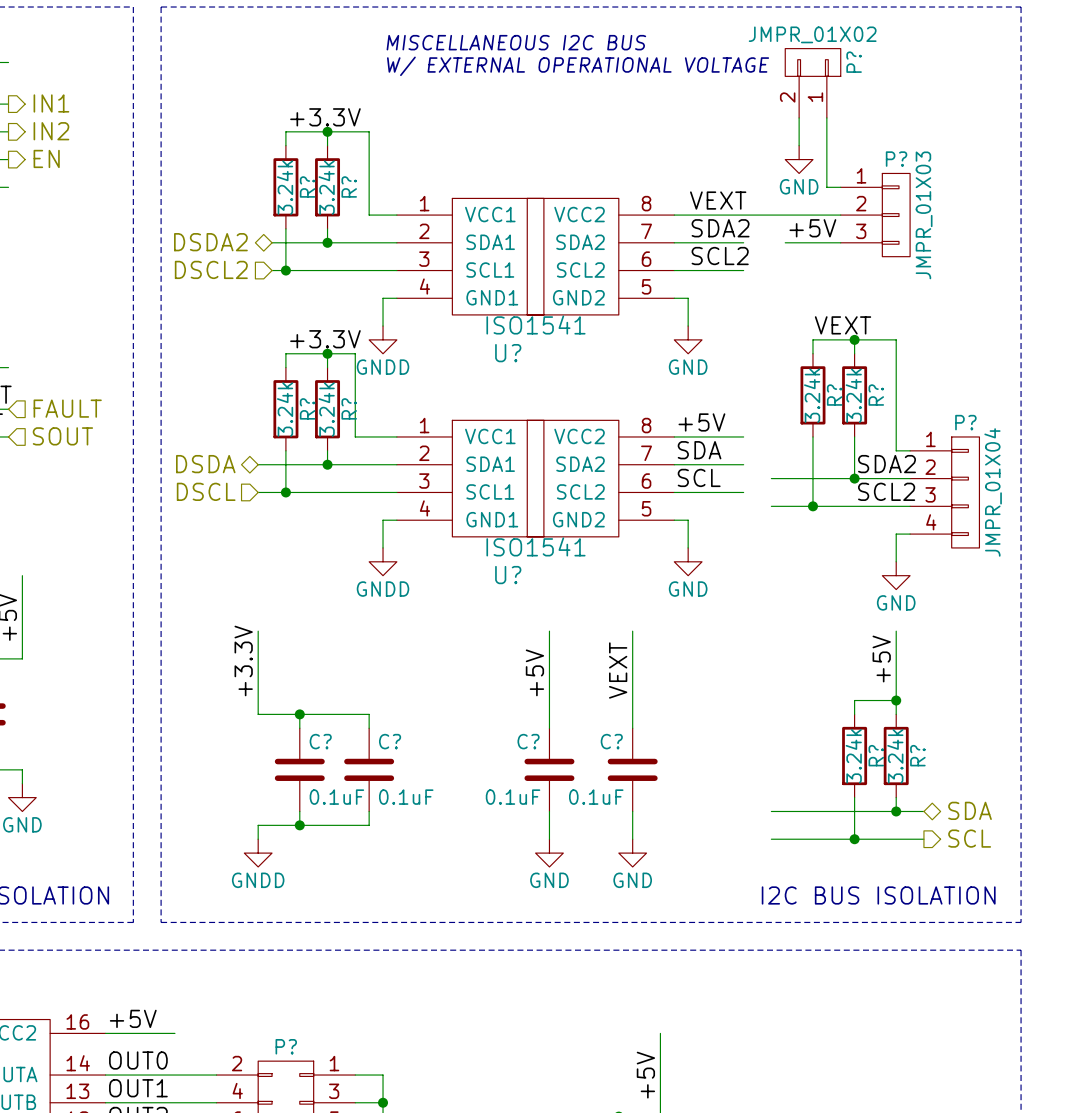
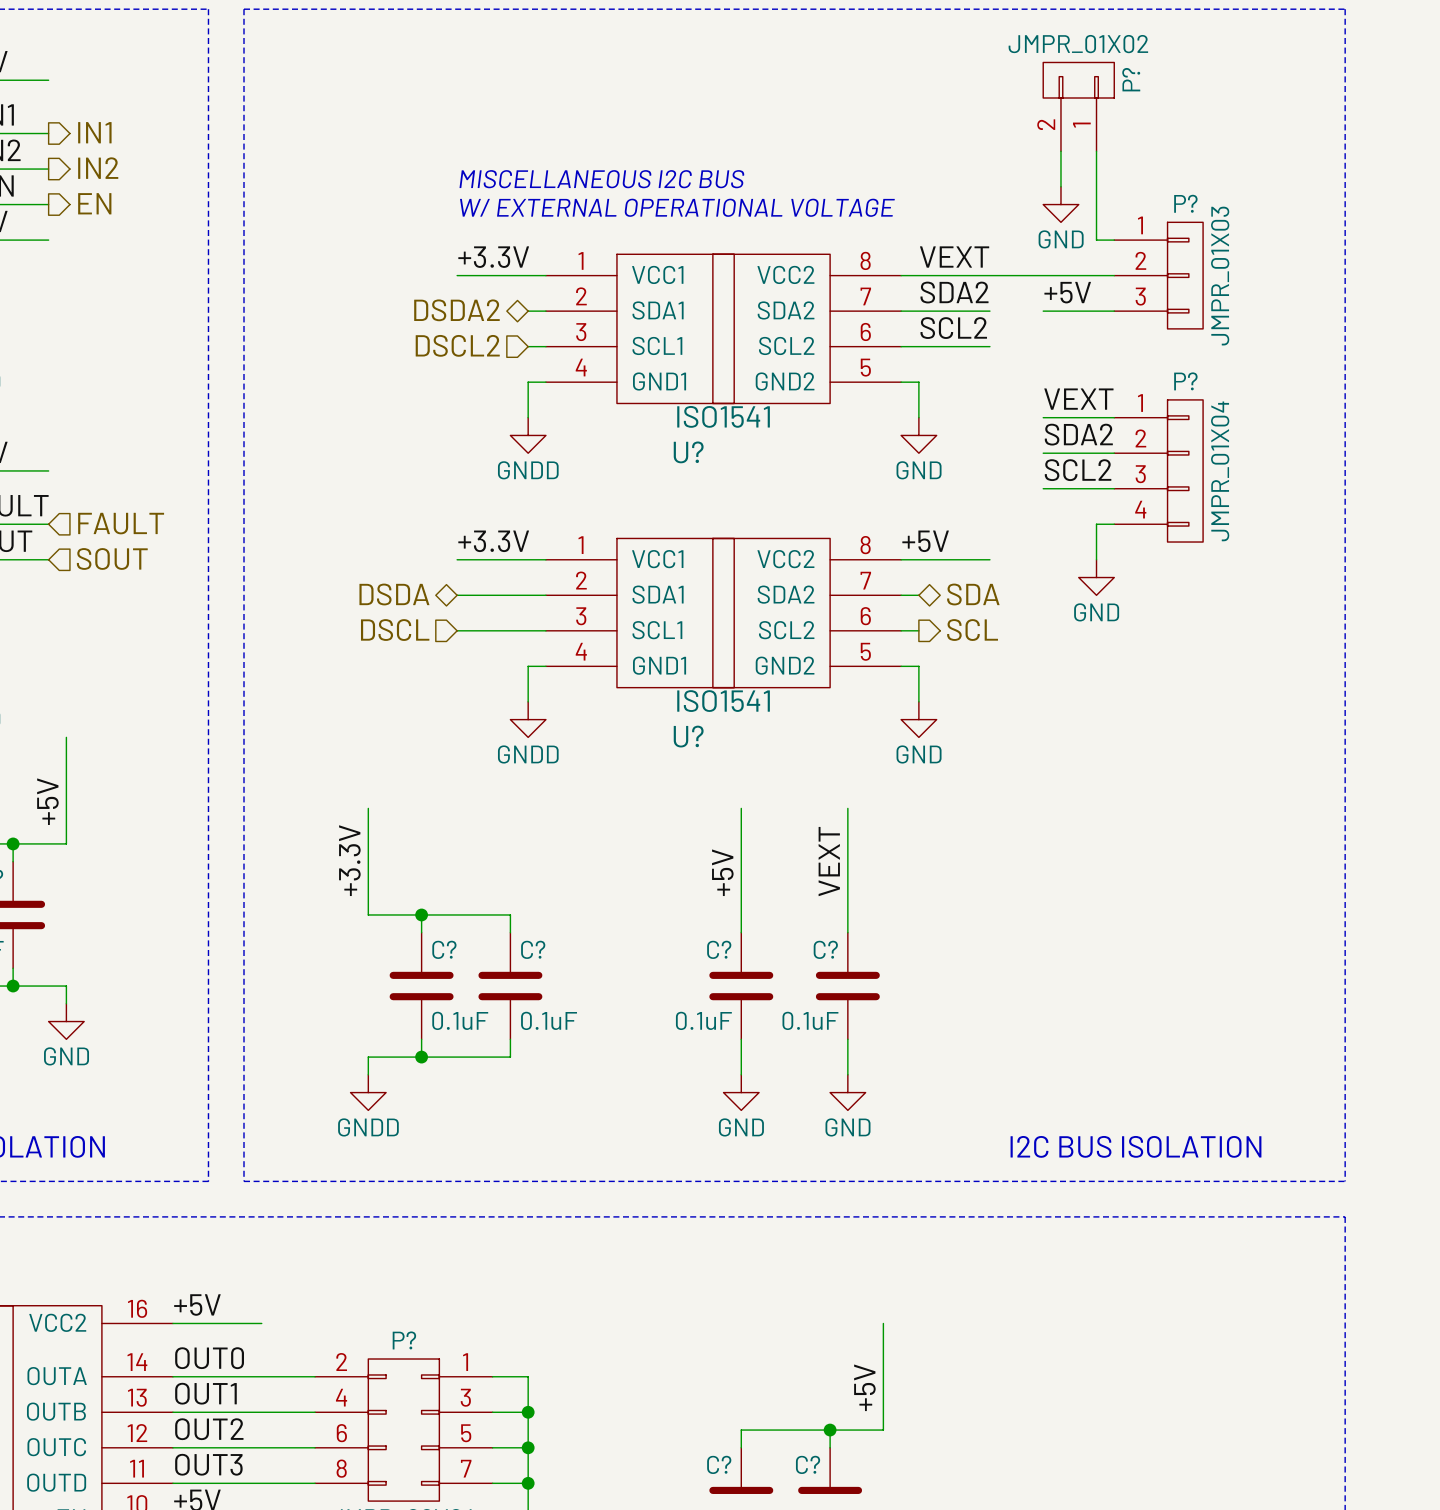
text position: MISCELLANEOUS I2C BUS (516, 42) -> MISCELLANEOUS I2C BUS (601, 179)
text position: W/ EXTERNAL OPERATIONAL VOLTAGE (578, 66) -> W/ EXTERNAL OPERATIONAL VOLTAGE (677, 207)
label: +3.3V (325, 117) -> none
wire: (327, 131) (327, 145) -> none
junction: (327, 131) -> none
wire: (285, 145) (285, 131) (369, 131) (369, 215) -> (457, 275) (510, 275)
R?: 3.24k (285, 187) -> none
R?: 3.24k (327, 187) -> none
label: none -> +3.3V (493, 257)
wire: (285, 228) (285, 270) -> none
wire: (327, 228) (327, 242) -> none
hierarchical label position: DSDA2 (210, 242) -> DSDA2 (456, 310)
wire: (272, 242) (383, 242) -> none
junction: (327, 242) -> none
hierarchical label position: DSCL2 (211, 269) -> DSCL2 (457, 345)
wire: (272, 270) (383, 270) -> none
junction: (285, 270) -> none
label position: VEXT (843, 325) -> VEXT (1078, 399)
wire: none -> (1043, 417) (1114, 417)
label: +3.3V (325, 339) -> none
wire: (854, 339) (854, 353) -> none
junction: (854, 339) -> none
wire: (327, 353) (327, 367) -> none
junction: (327, 353) -> none
wire: (812, 353) (812, 339) (896, 339) (896, 450) (910, 450) -> none
wire: (285, 367) (285, 353) (355, 353) (355, 436) -> (457, 559) (492, 559)
R?: 3.24k (812, 395) -> none
R?: 3.24k (854, 395) -> none
R?: 3.24k (285, 409) -> none
R?: 3.24k (327, 409) -> none
label: none -> +3.3V (493, 541)
wire: (812, 436) (812, 506) -> none
wire: (854, 436) (854, 478) -> none
wire: (285, 450) (285, 492) -> none
wire: (327, 450) (327, 464) (258, 464) -> none
label: SDA (699, 450) -> none
hierarchical label position: DSDA (205, 464) -> DSDA (394, 594)
junction: (327, 464) -> none
wire: (688, 464) (743, 464) -> (1043, 453) (1114, 453)
hierarchical label: none -> SDA (973, 594)
label position: SDA2 (887, 464) -> SDA2 (1078, 434)
label: SCL (699, 477) -> none
wire: (771, 478) (910, 478) -> none
junction: (854, 478) -> none
hierarchical label position: DSCL (206, 491) -> DSCL (395, 630)
hierarchical label: none -> SCL (972, 630)
label position: SCL2 (886, 491) -> SCL2 (1078, 470)
wire: (258, 492) (327, 492) -> none
junction: (285, 492) -> none
wire: (688, 492) (743, 492) -> (1043, 488) (1114, 488)
P? position: (944, 492) -> (1158, 470)
wire: (771, 506) (910, 506) -> none
junction: (812, 506) -> none
wire: (910, 534) (896, 534) (896, 561) -> (1114, 524) (1096, 524) (1096, 559)
power symbol position: GND (896, 575) -> GND (1096, 577)
wire: (896, 631) (896, 714) -> none
label: +5V (881, 659) -> none
wire: (896, 700) (854, 700) (854, 714) -> none
junction: (896, 700) -> none
R?: 3.24k (854, 756) -> none
R?: 3.24k (896, 756) -> none
wire: (854, 797) (854, 839) -> none
wire: (896, 797) (896, 811) -> none
hierarchical label: SDA (970, 810) -> none
wire: (771, 811) (923, 811) -> none
junction: (896, 811) -> none
hierarchical label: SCL (969, 838) -> none
wire: (771, 839) (923, 839) -> none
junction: (854, 839) -> none

